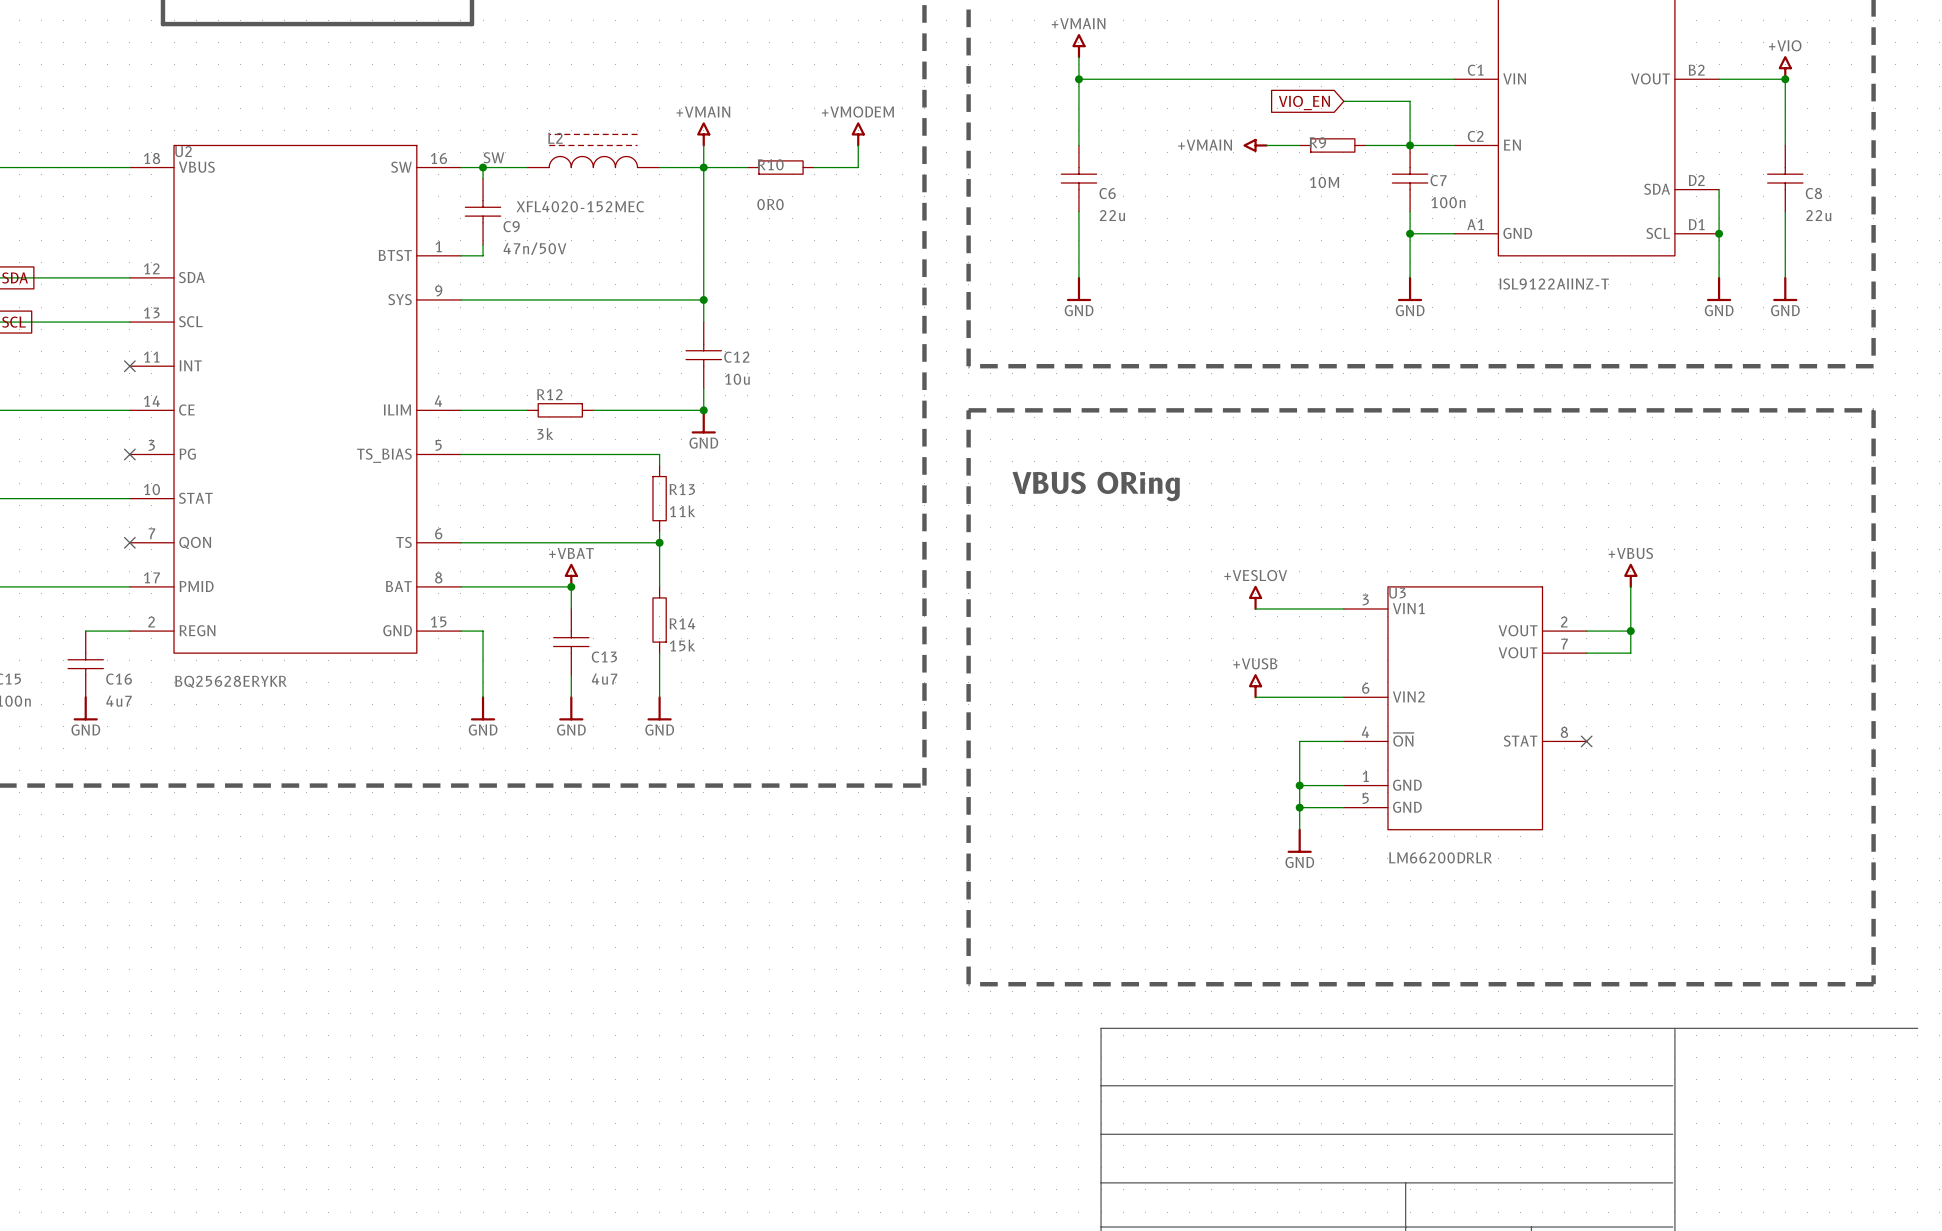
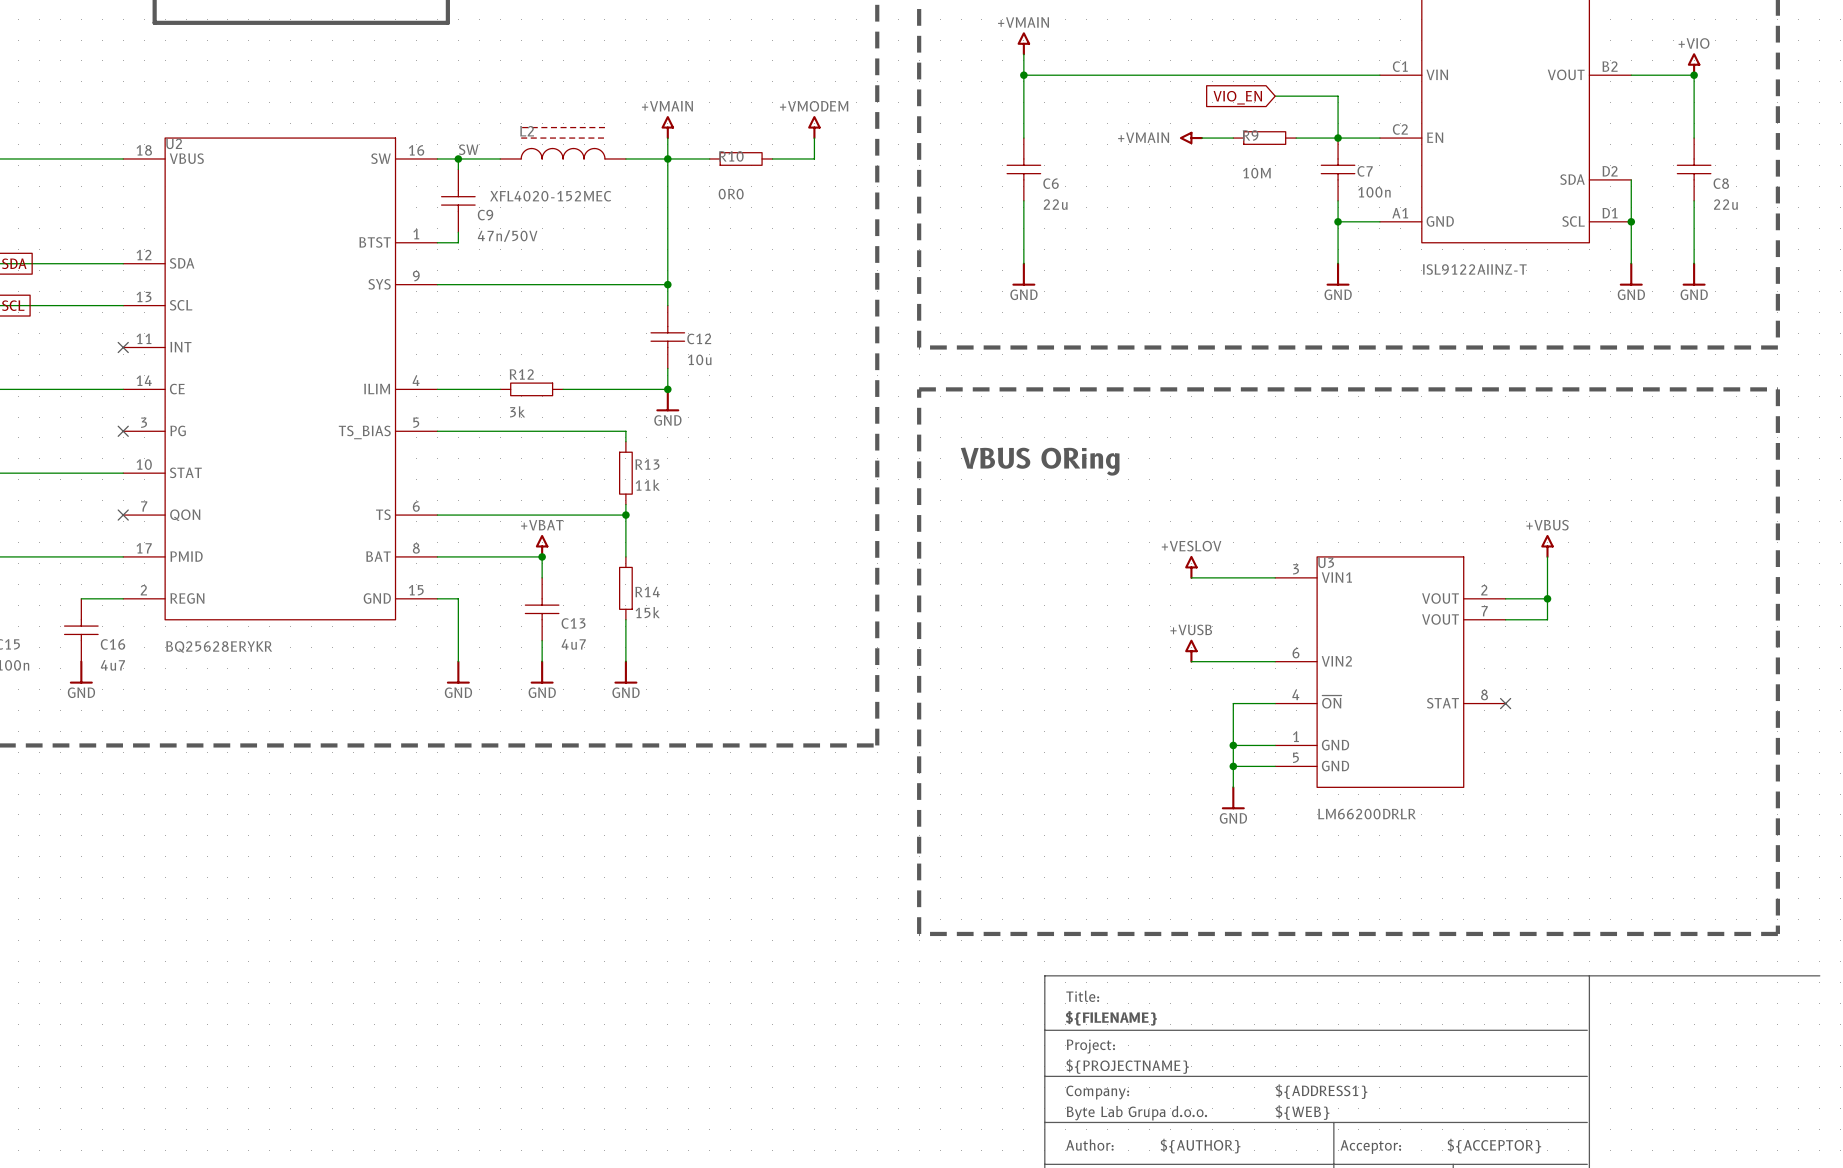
text: none -> Title: (1082, 996)
text: none -> ${FILENAME} (1111, 1018)
text: none -> Project: (1090, 1046)
text: none -> ${PROJECTNAME} (1127, 1066)
text: none -> ${ADDRESS1} (1321, 1091)
text: none -> Company: (1097, 1092)
text: none -> ${WEB} (1302, 1112)
text: none -> Byte Lab Grupa d.o.o. (1136, 1113)
text: none -> Author: (1089, 1145)
text: none -> ${AUTHOR} (1200, 1146)
text: none -> ${ACCEPTOR} (1494, 1146)
text: none -> Acceptor: (1370, 1147)

